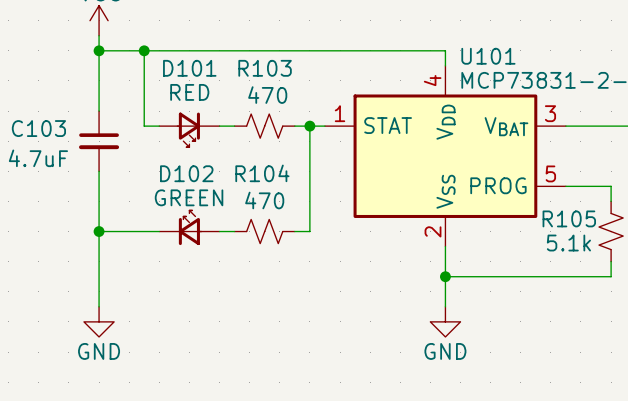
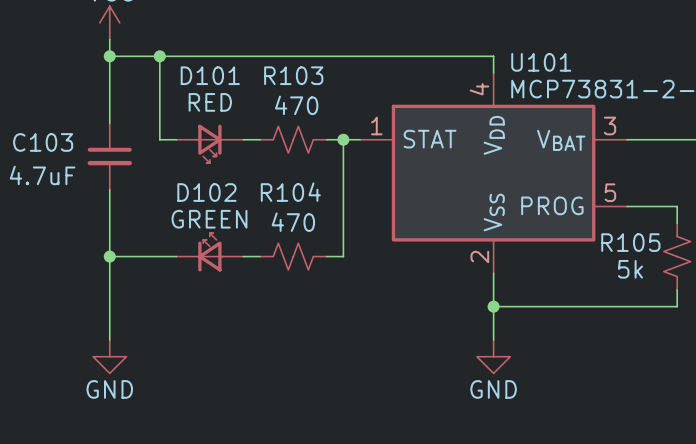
R105 value: 5.1k (568, 243) -> 5k (630, 269)

